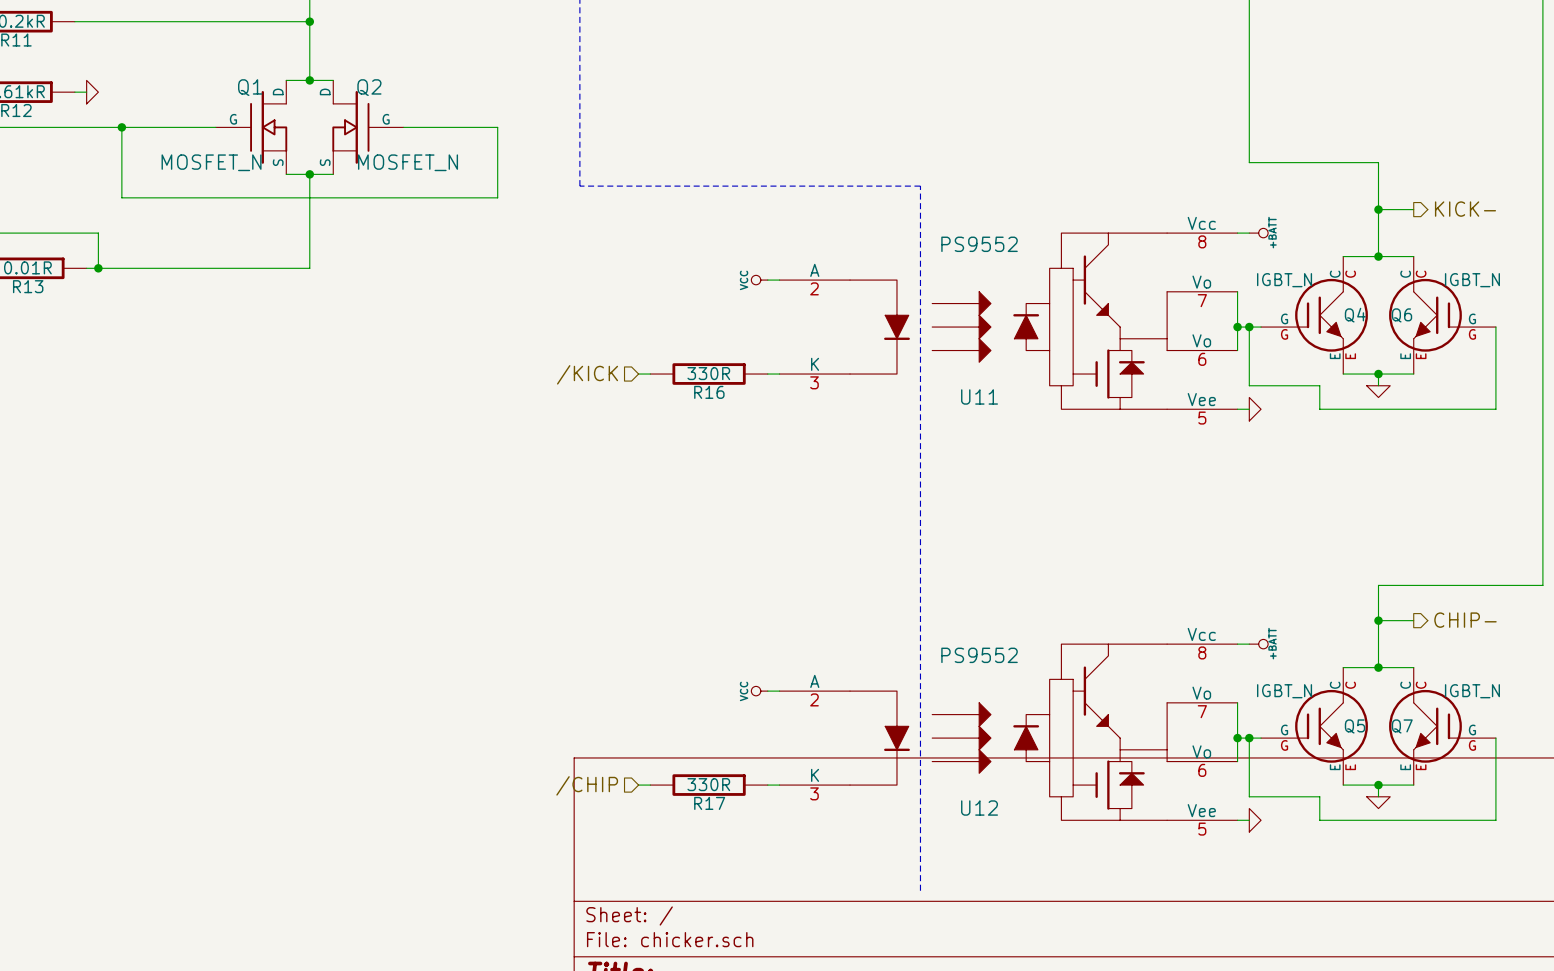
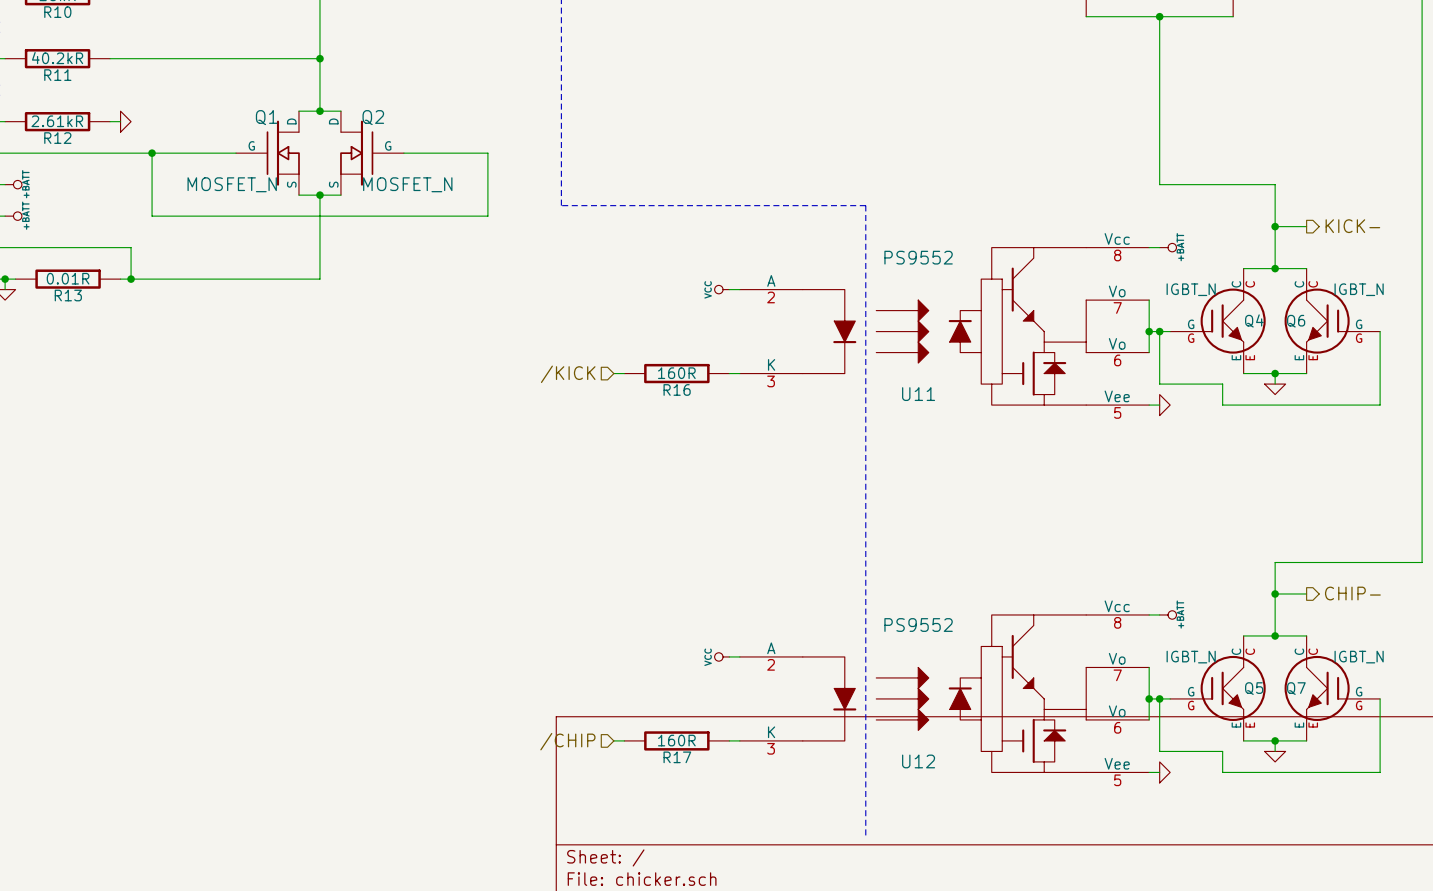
R16 value: 330R (708, 373) -> 160R (676, 373)
R17 value: 330R (708, 784) -> 160R (676, 740)

